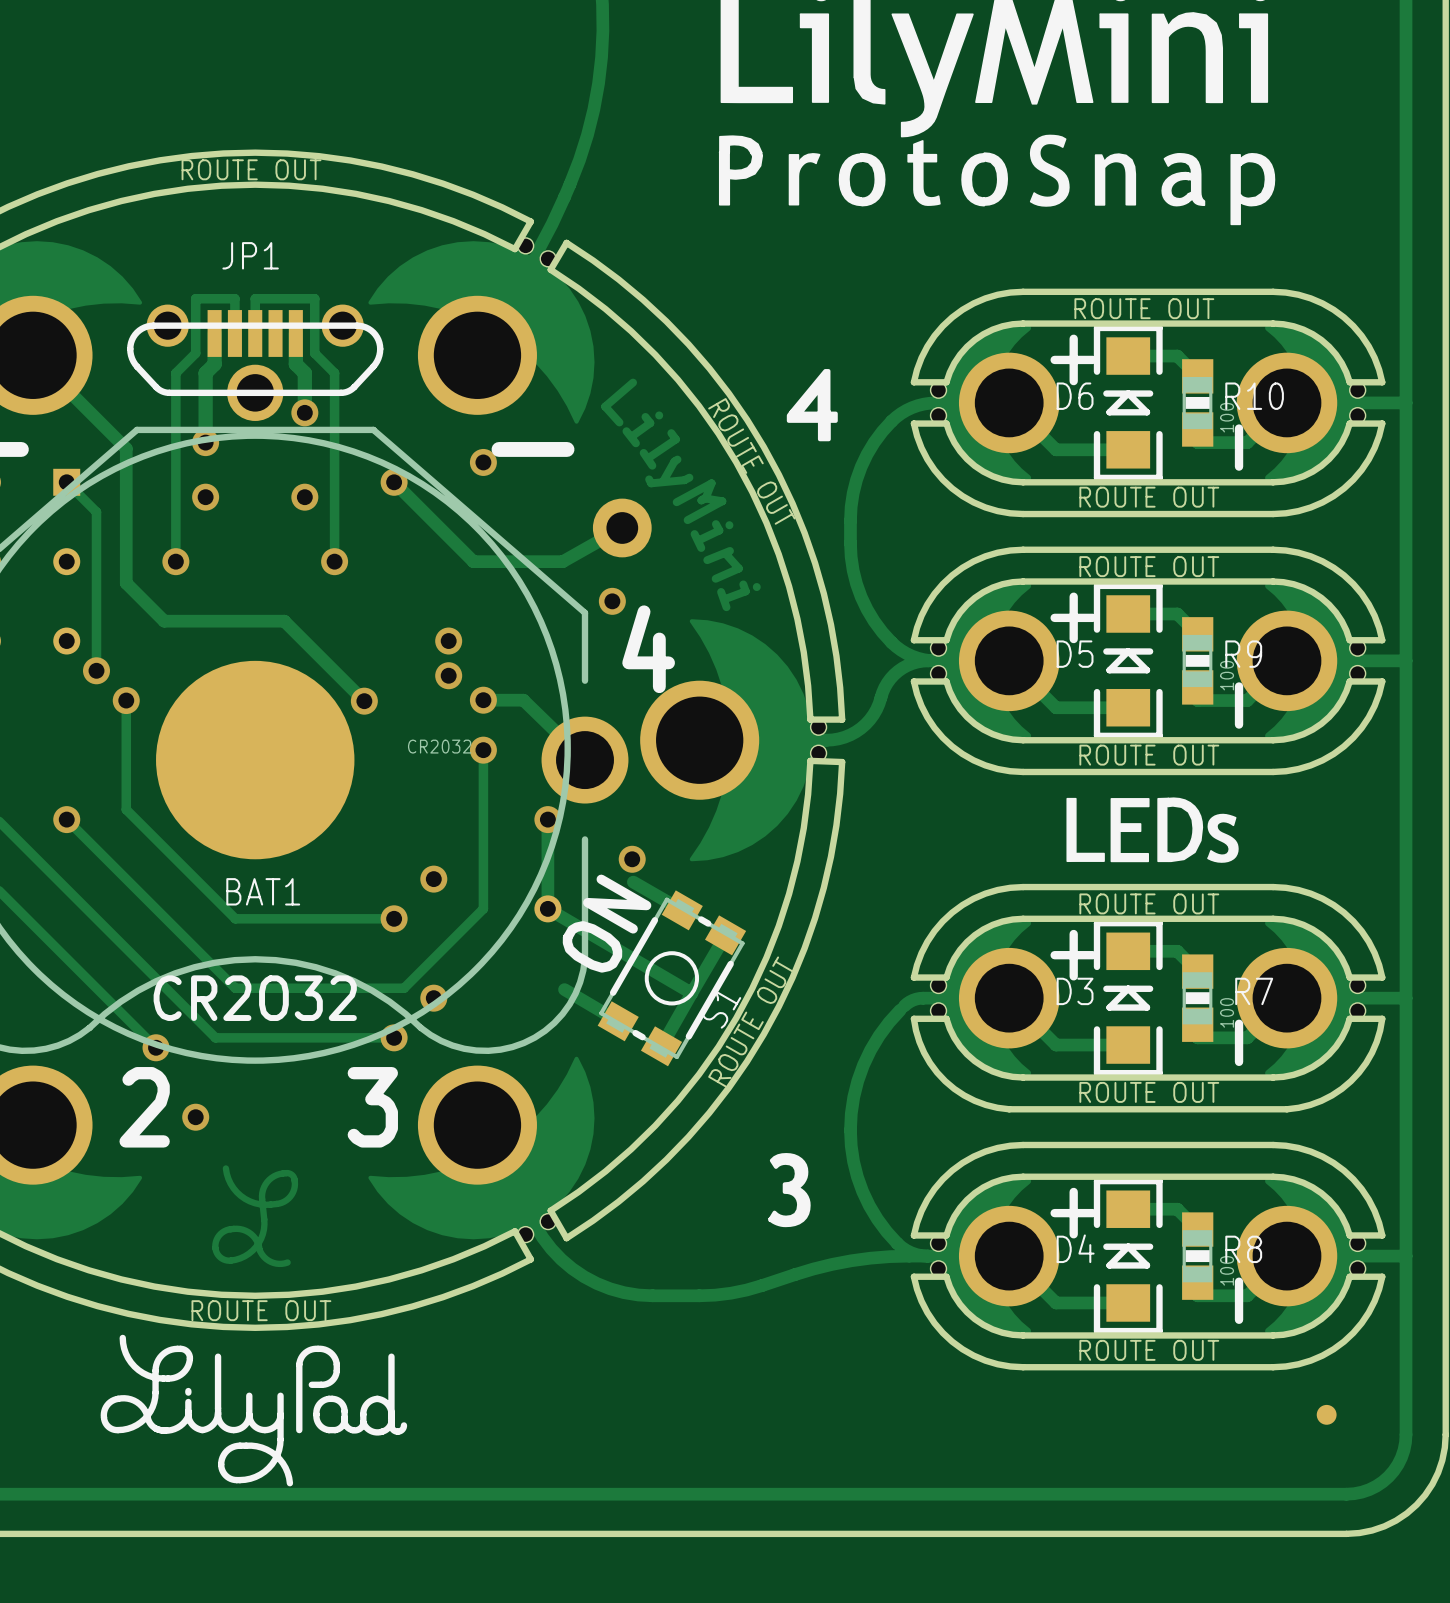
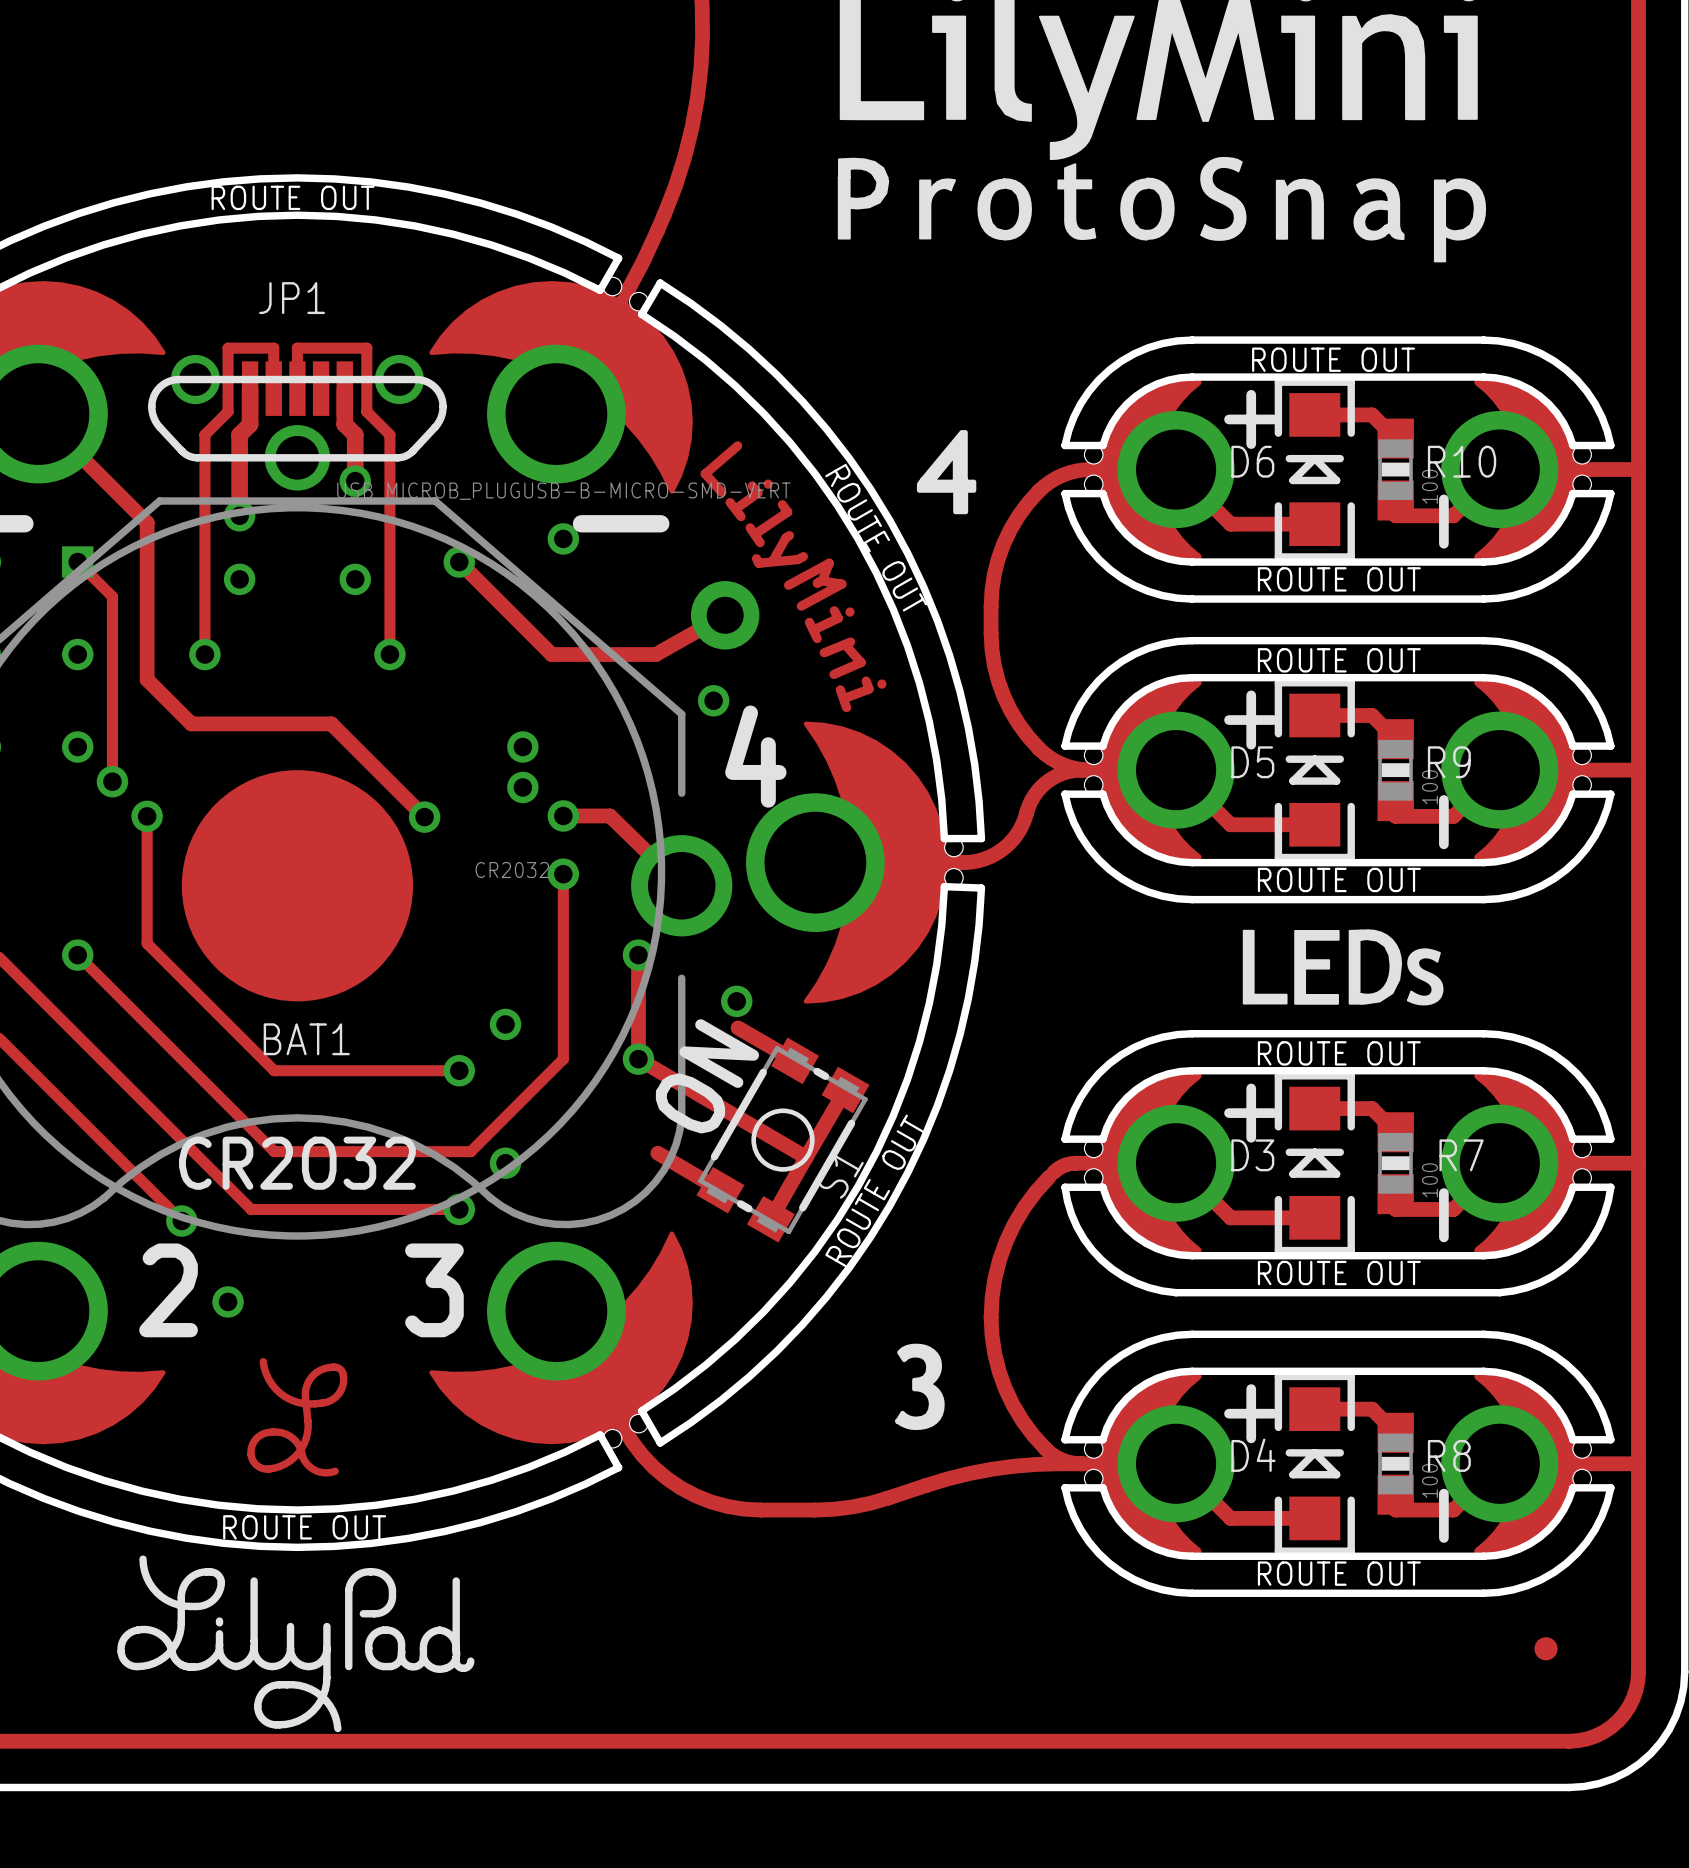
JP1 value: none -> USB_MICROB_PLUGUSB-B-MICRO-SMD-VERT (563, 491)

